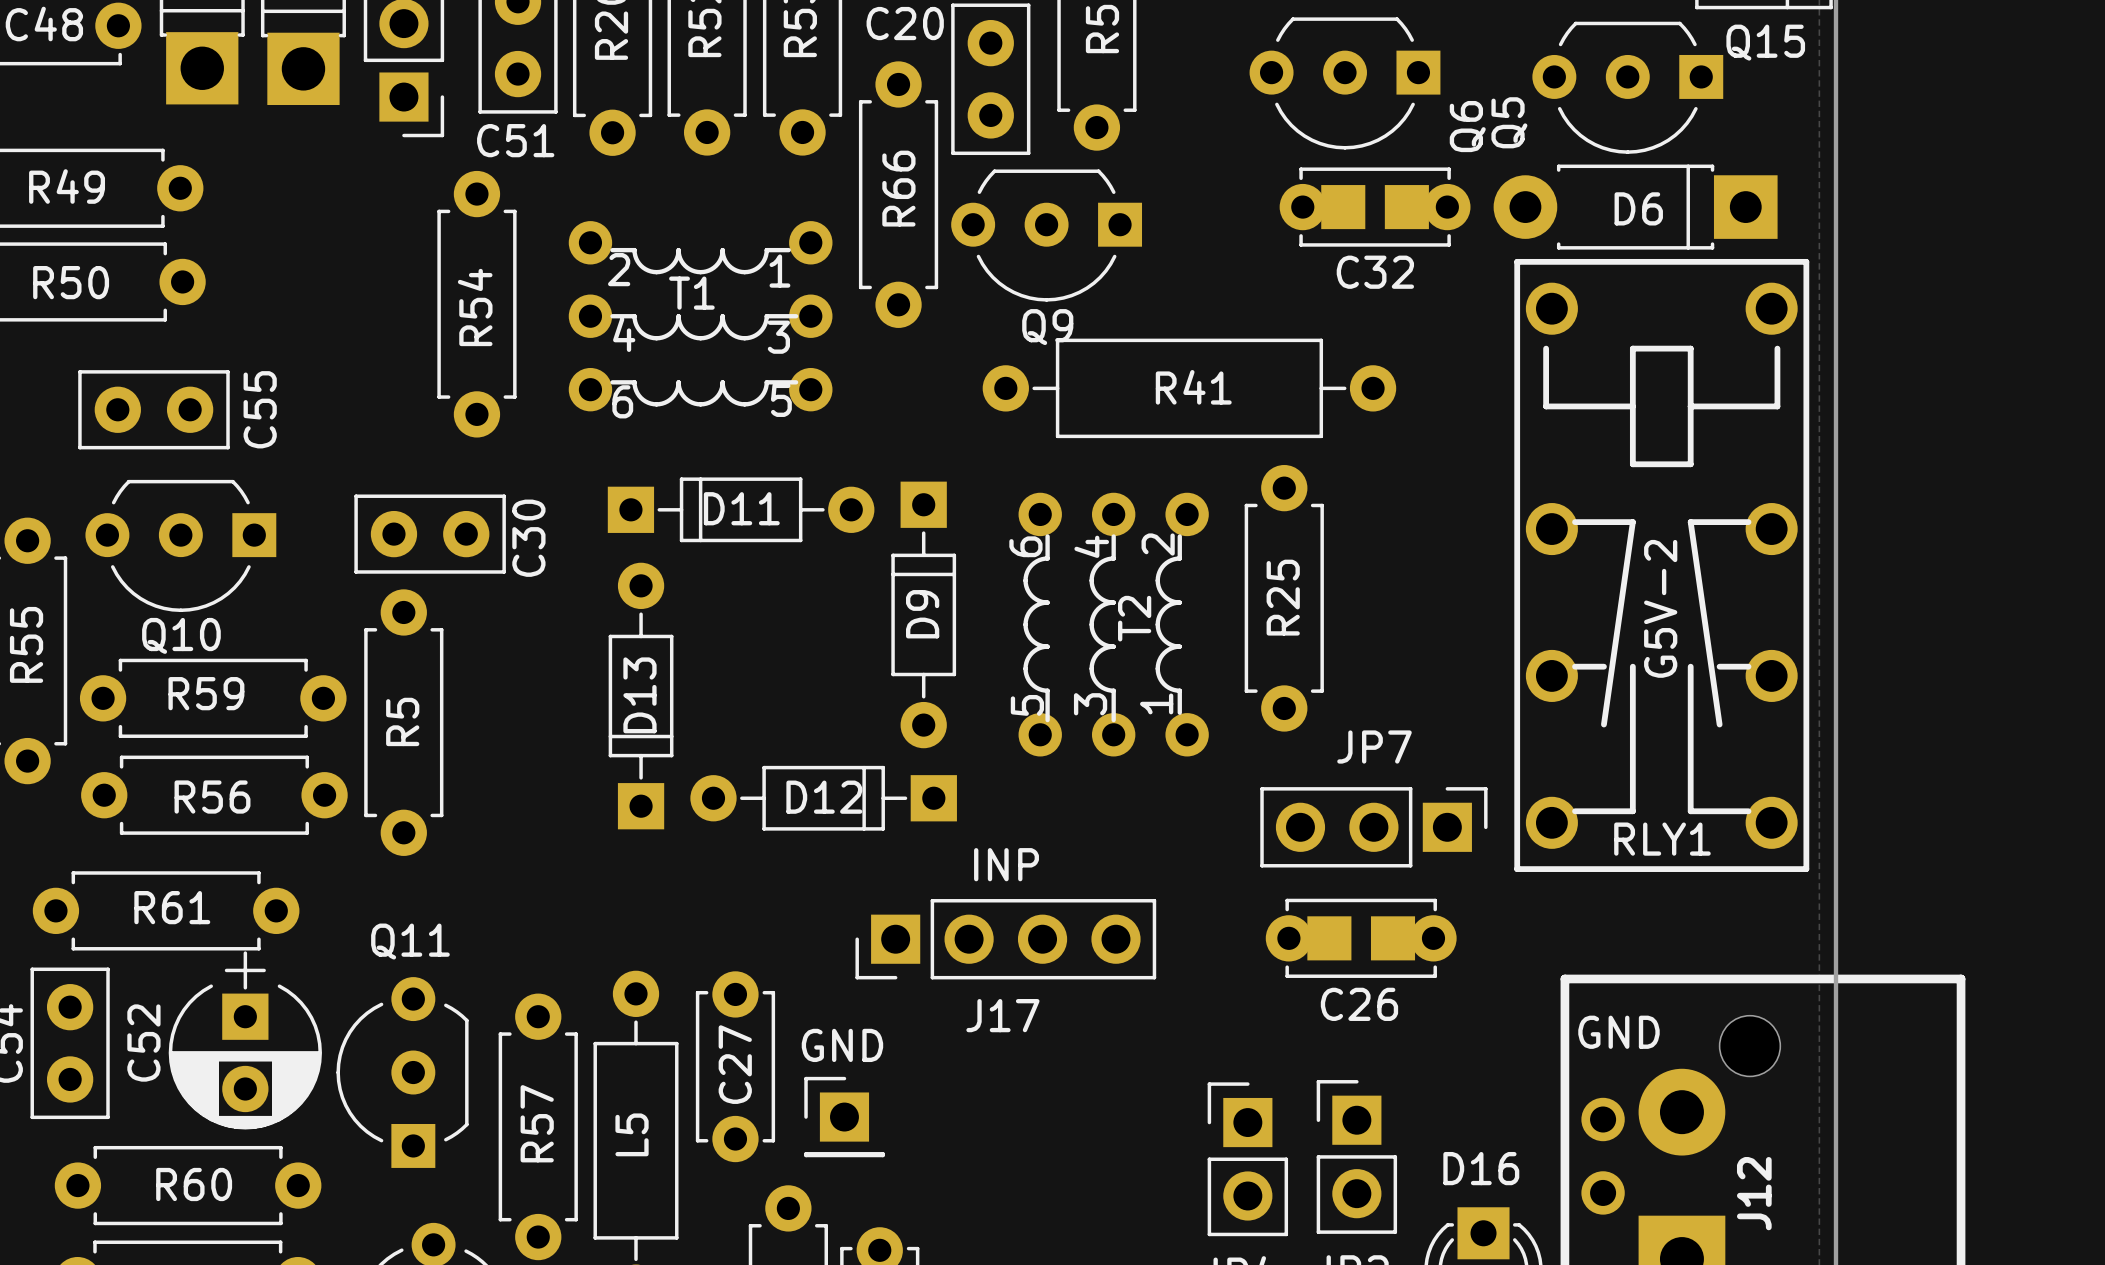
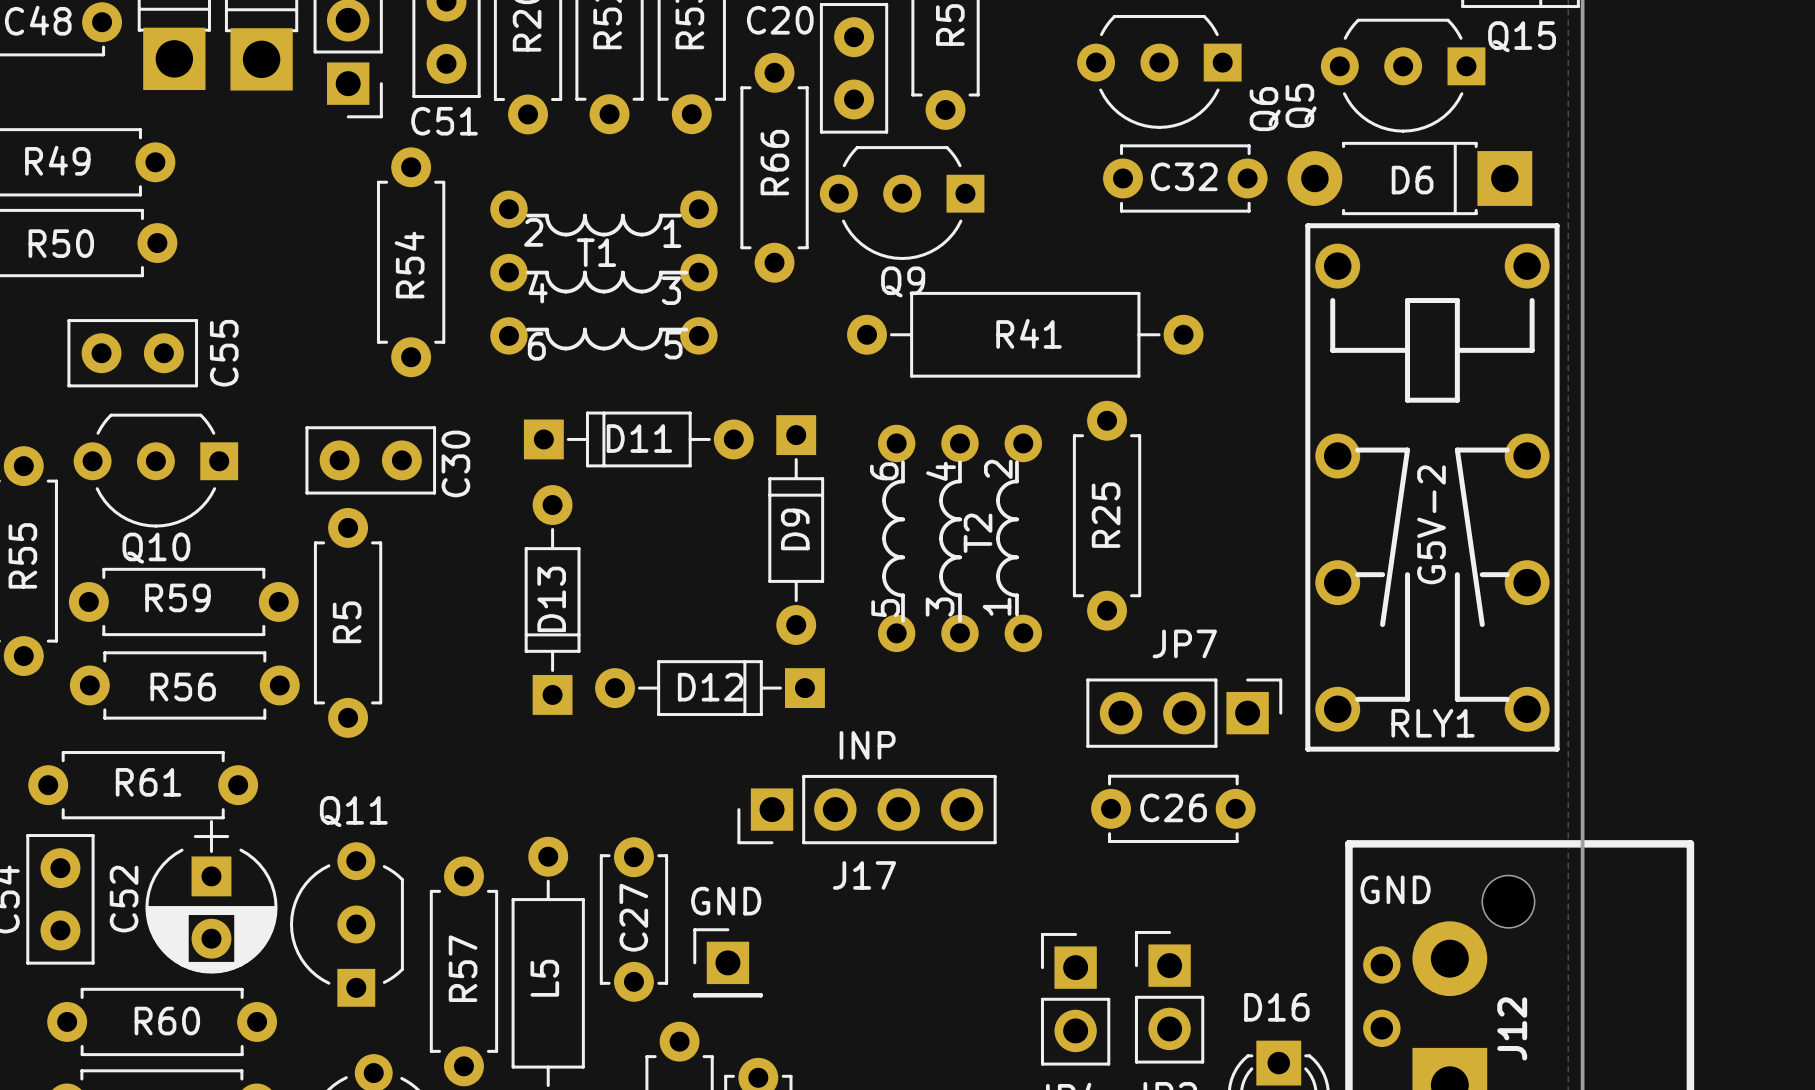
C32 footprint: [1279, 167, 1471, 247] -> [1103, 144, 1268, 213]
C32 name position: C32 (1375, 272) -> C32 (1184, 176)
C26 footprint: [1265, 898, 1457, 978] -> [1091, 774, 1256, 843]
C26 name position: C26 (1359, 1004) -> C26 (1173, 807)

